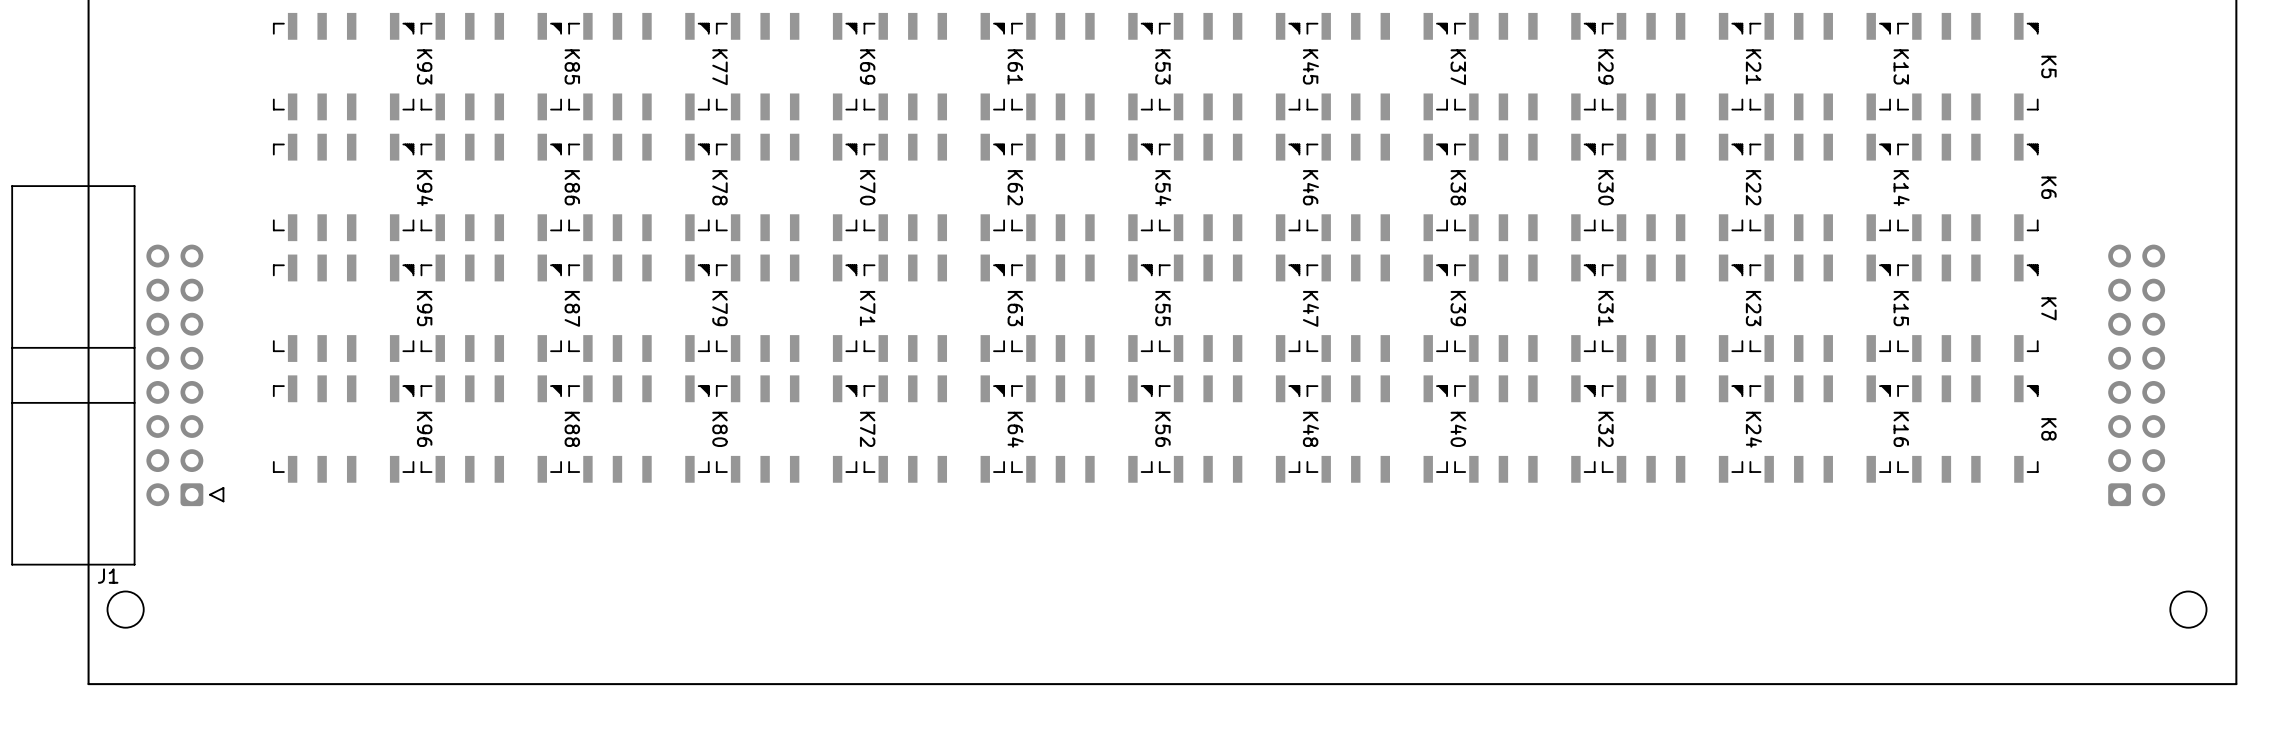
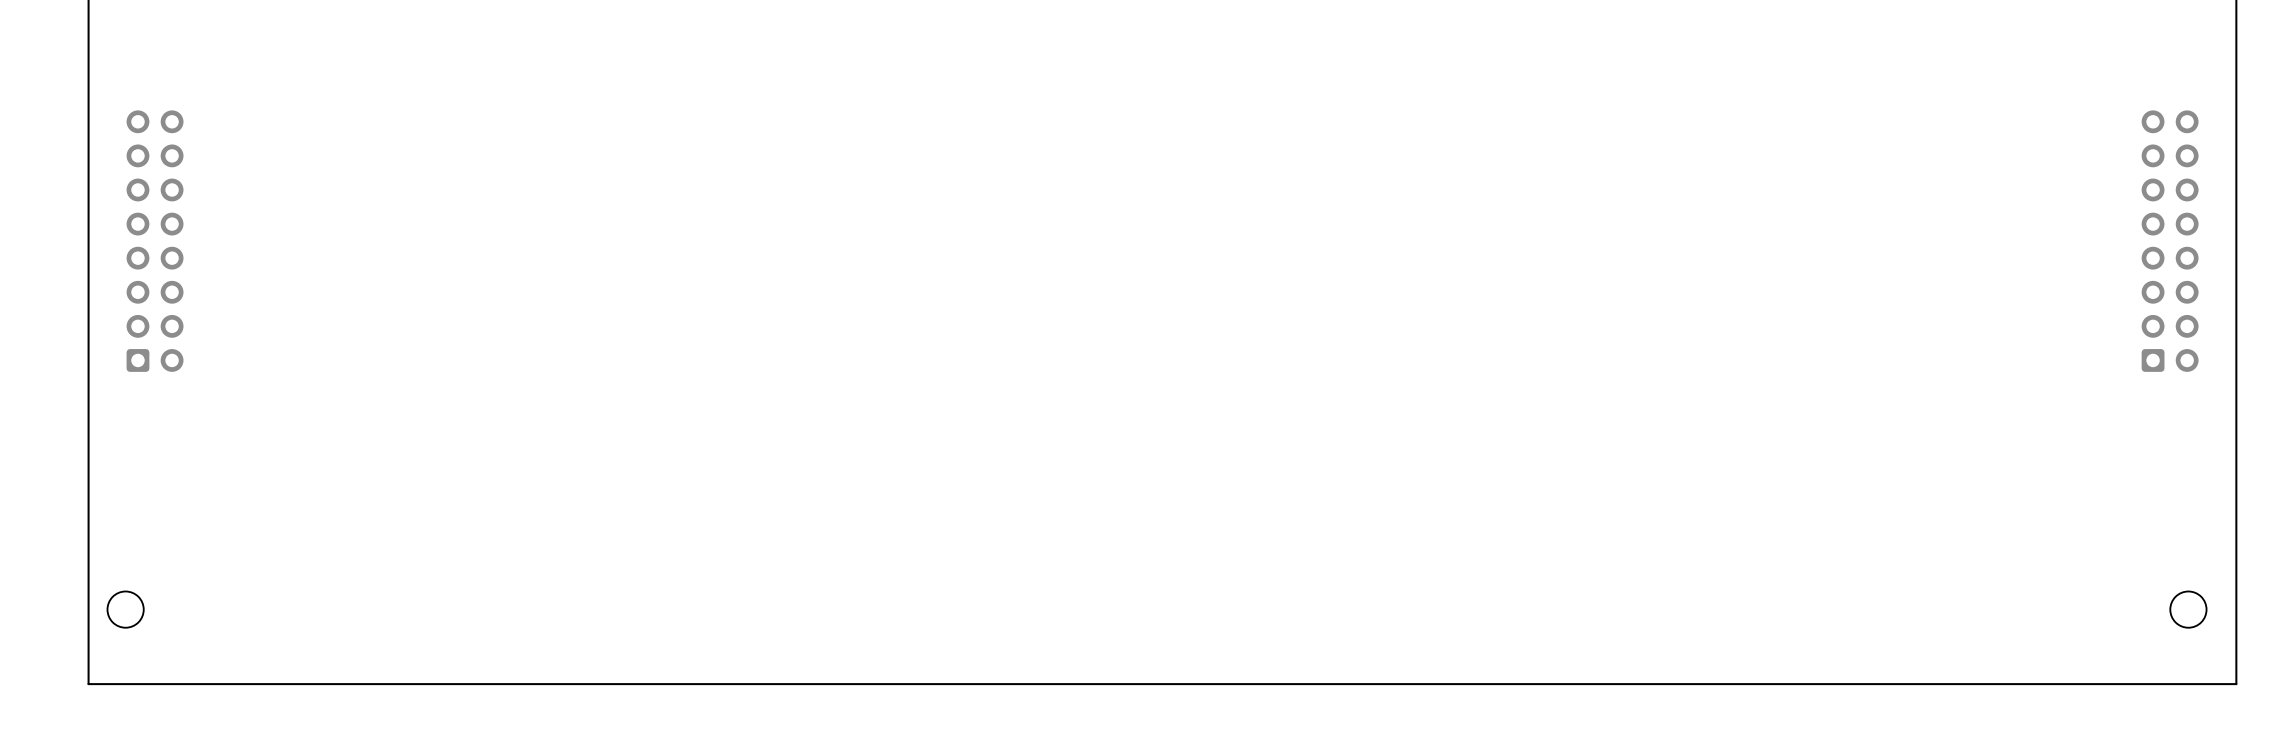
K93: (343, 66) -> none
K85: (491, 66) -> none
K77: (638, 66) -> none
K69: (786, 66) -> none
K61: (934, 66) -> none
K53: (1081, 66) -> none
K45: (1229, 66) -> none
K37: (1377, 66) -> none
K29: (1524, 66) -> none
K21: (1672, 66) -> none
K13: (1820, 66) -> none
K5: (1967, 66) -> none
K94: (343, 187) -> none
K86: (491, 187) -> none
K78: (638, 187) -> none
K70: (786, 187) -> none
K62: (934, 187) -> none
K54: (1081, 187) -> none
K46: (1229, 187) -> none
K38: (1377, 187) -> none
K30: (1524, 187) -> none
K22: (1672, 187) -> none
K14: (1820, 187) -> none
K6: (1967, 187) -> none
K95: (343, 308) -> none
K87: (491, 308) -> none
K79: (638, 308) -> none
K71: (786, 308) -> none
K63: (934, 308) -> none
K55: (1081, 308) -> none
K47: (1229, 308) -> none
K39: (1377, 308) -> none
K31: (1524, 308) -> none
K23: (1672, 308) -> none
K15: (1820, 308) -> none
K7: (1967, 308) -> none
J1 side: bottom (117, 375) -> top (155, 241)
part position: (2136, 375) -> (2170, 241)
K96: (343, 429) -> none
K88: (491, 429) -> none
K80: (638, 429) -> none
K72: (786, 429) -> none
K64: (934, 429) -> none
K56: (1081, 429) -> none
K48: (1229, 429) -> none
K40: (1377, 429) -> none
K32: (1524, 429) -> none
K24: (1672, 429) -> none
K16: (1820, 429) -> none
K8: (1967, 429) -> none

